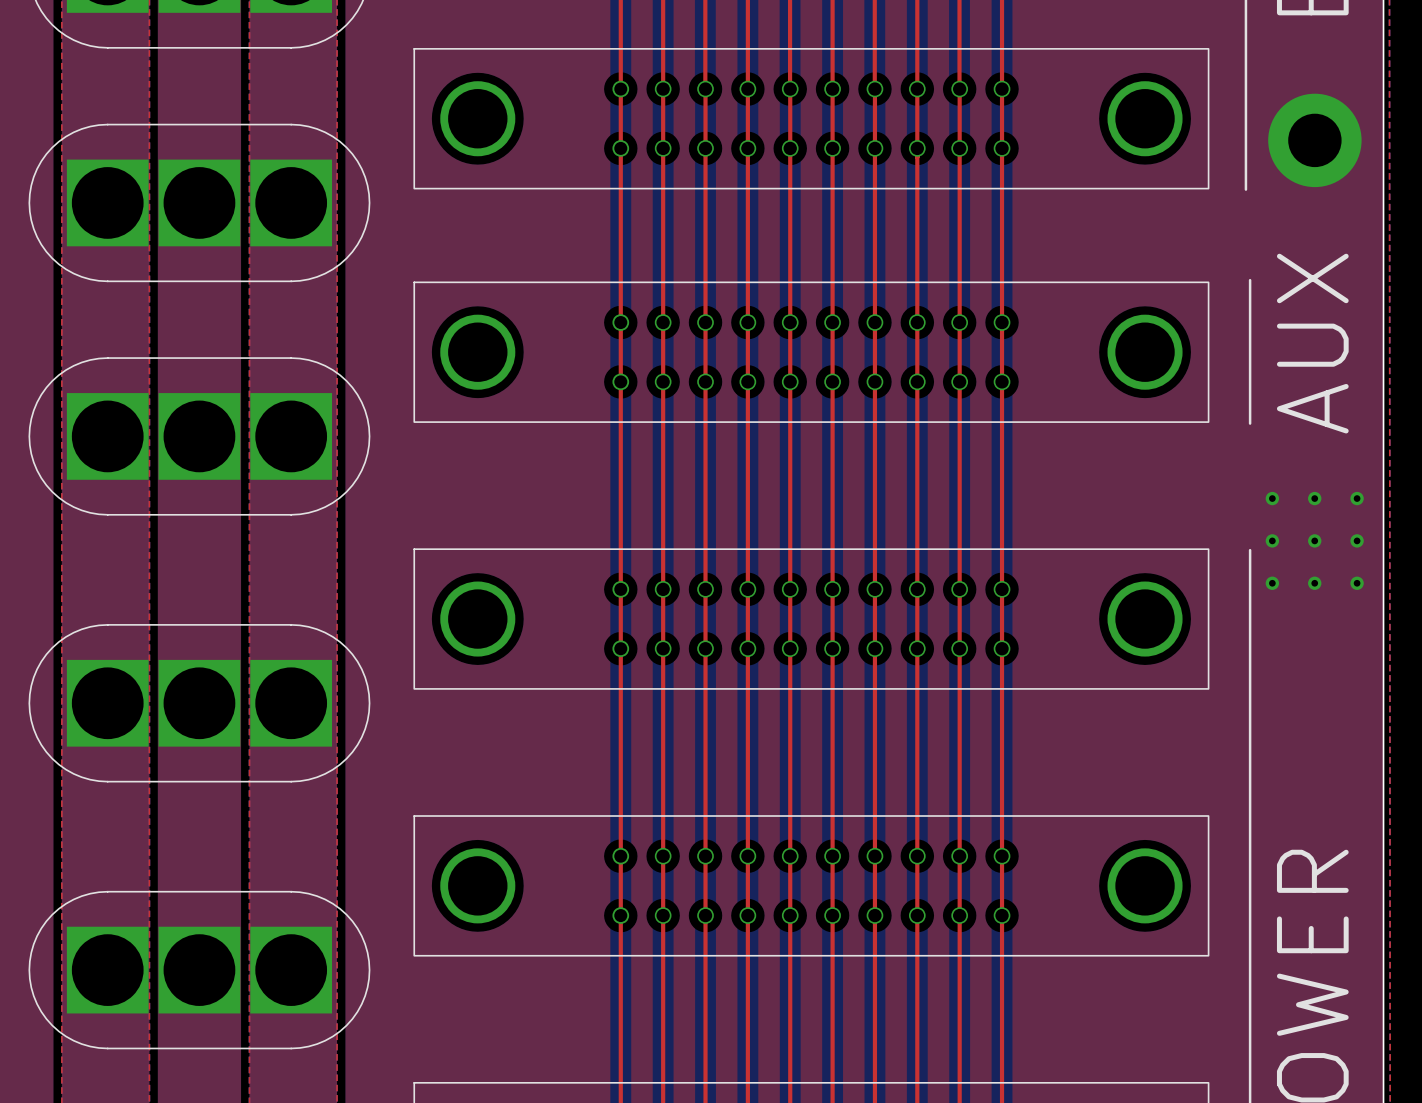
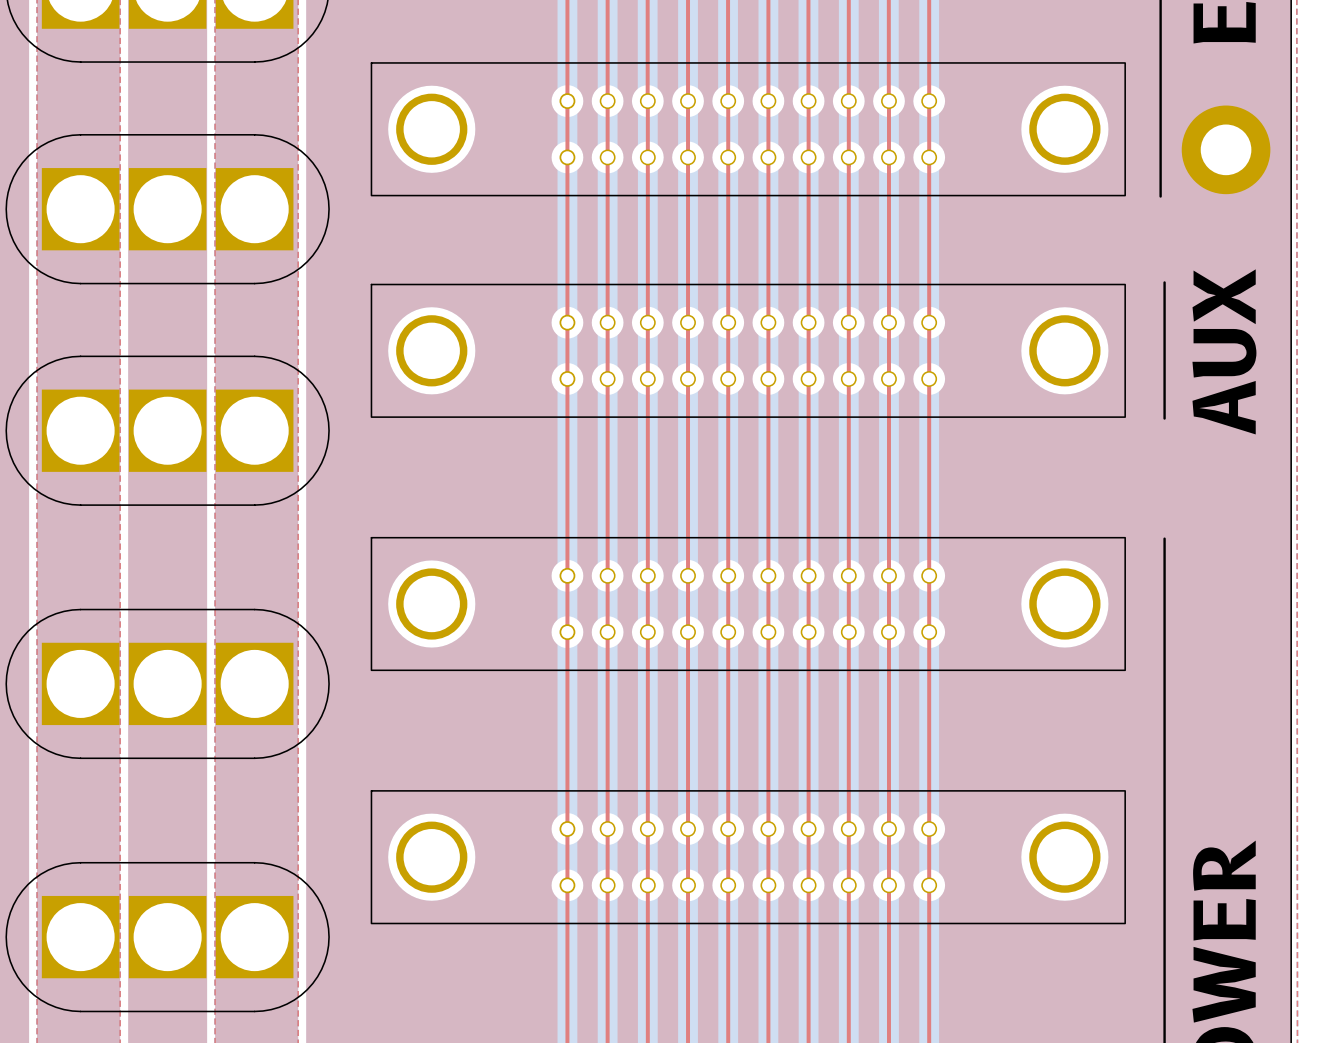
via: (1272, 498) -> none
via: (1314, 498) -> none
via: (1357, 498) -> none
via: (1272, 540) -> none
via: (1314, 540) -> none
via: (1357, 540) -> none
via: (1272, 583) -> none
via: (1314, 583) -> none
via: (1357, 583) -> none

